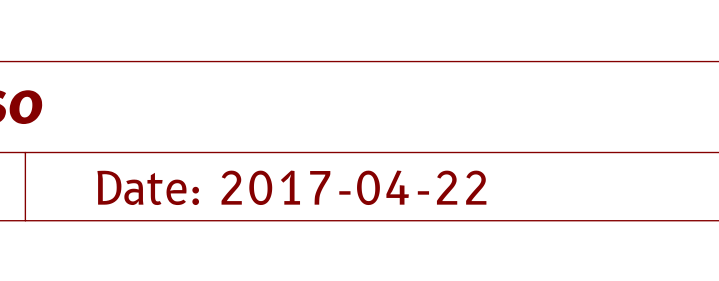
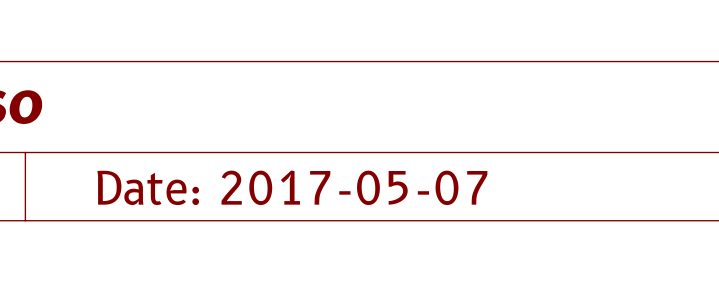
title block: Date: 2017-04-22 (291, 187) -> Date: 2017-05-07 (292, 187)

